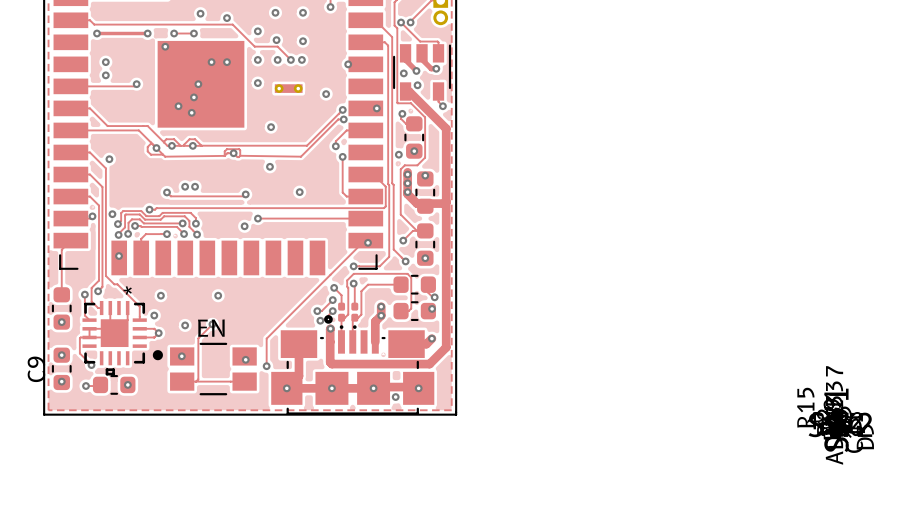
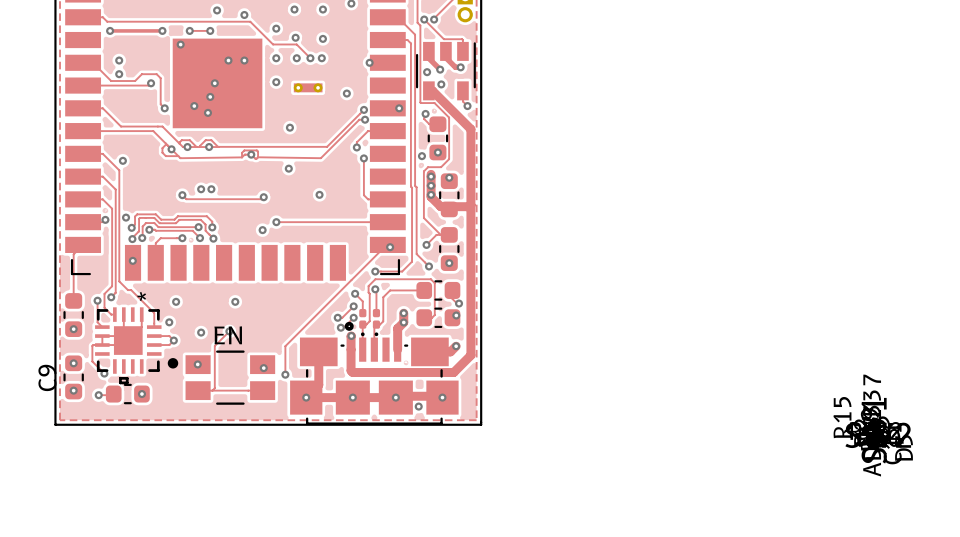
track: none -> (83, 62) (92, 62) (111, 81) (135, 81) (141, 74) (156, 74) (160, 78) (160, 104) (164, 108)
track: (365, 174) (373, 174) (385, 186) (385, 206) (384, 208) (149, 209) -> none
via position: (149, 209) -> (164, 108)

